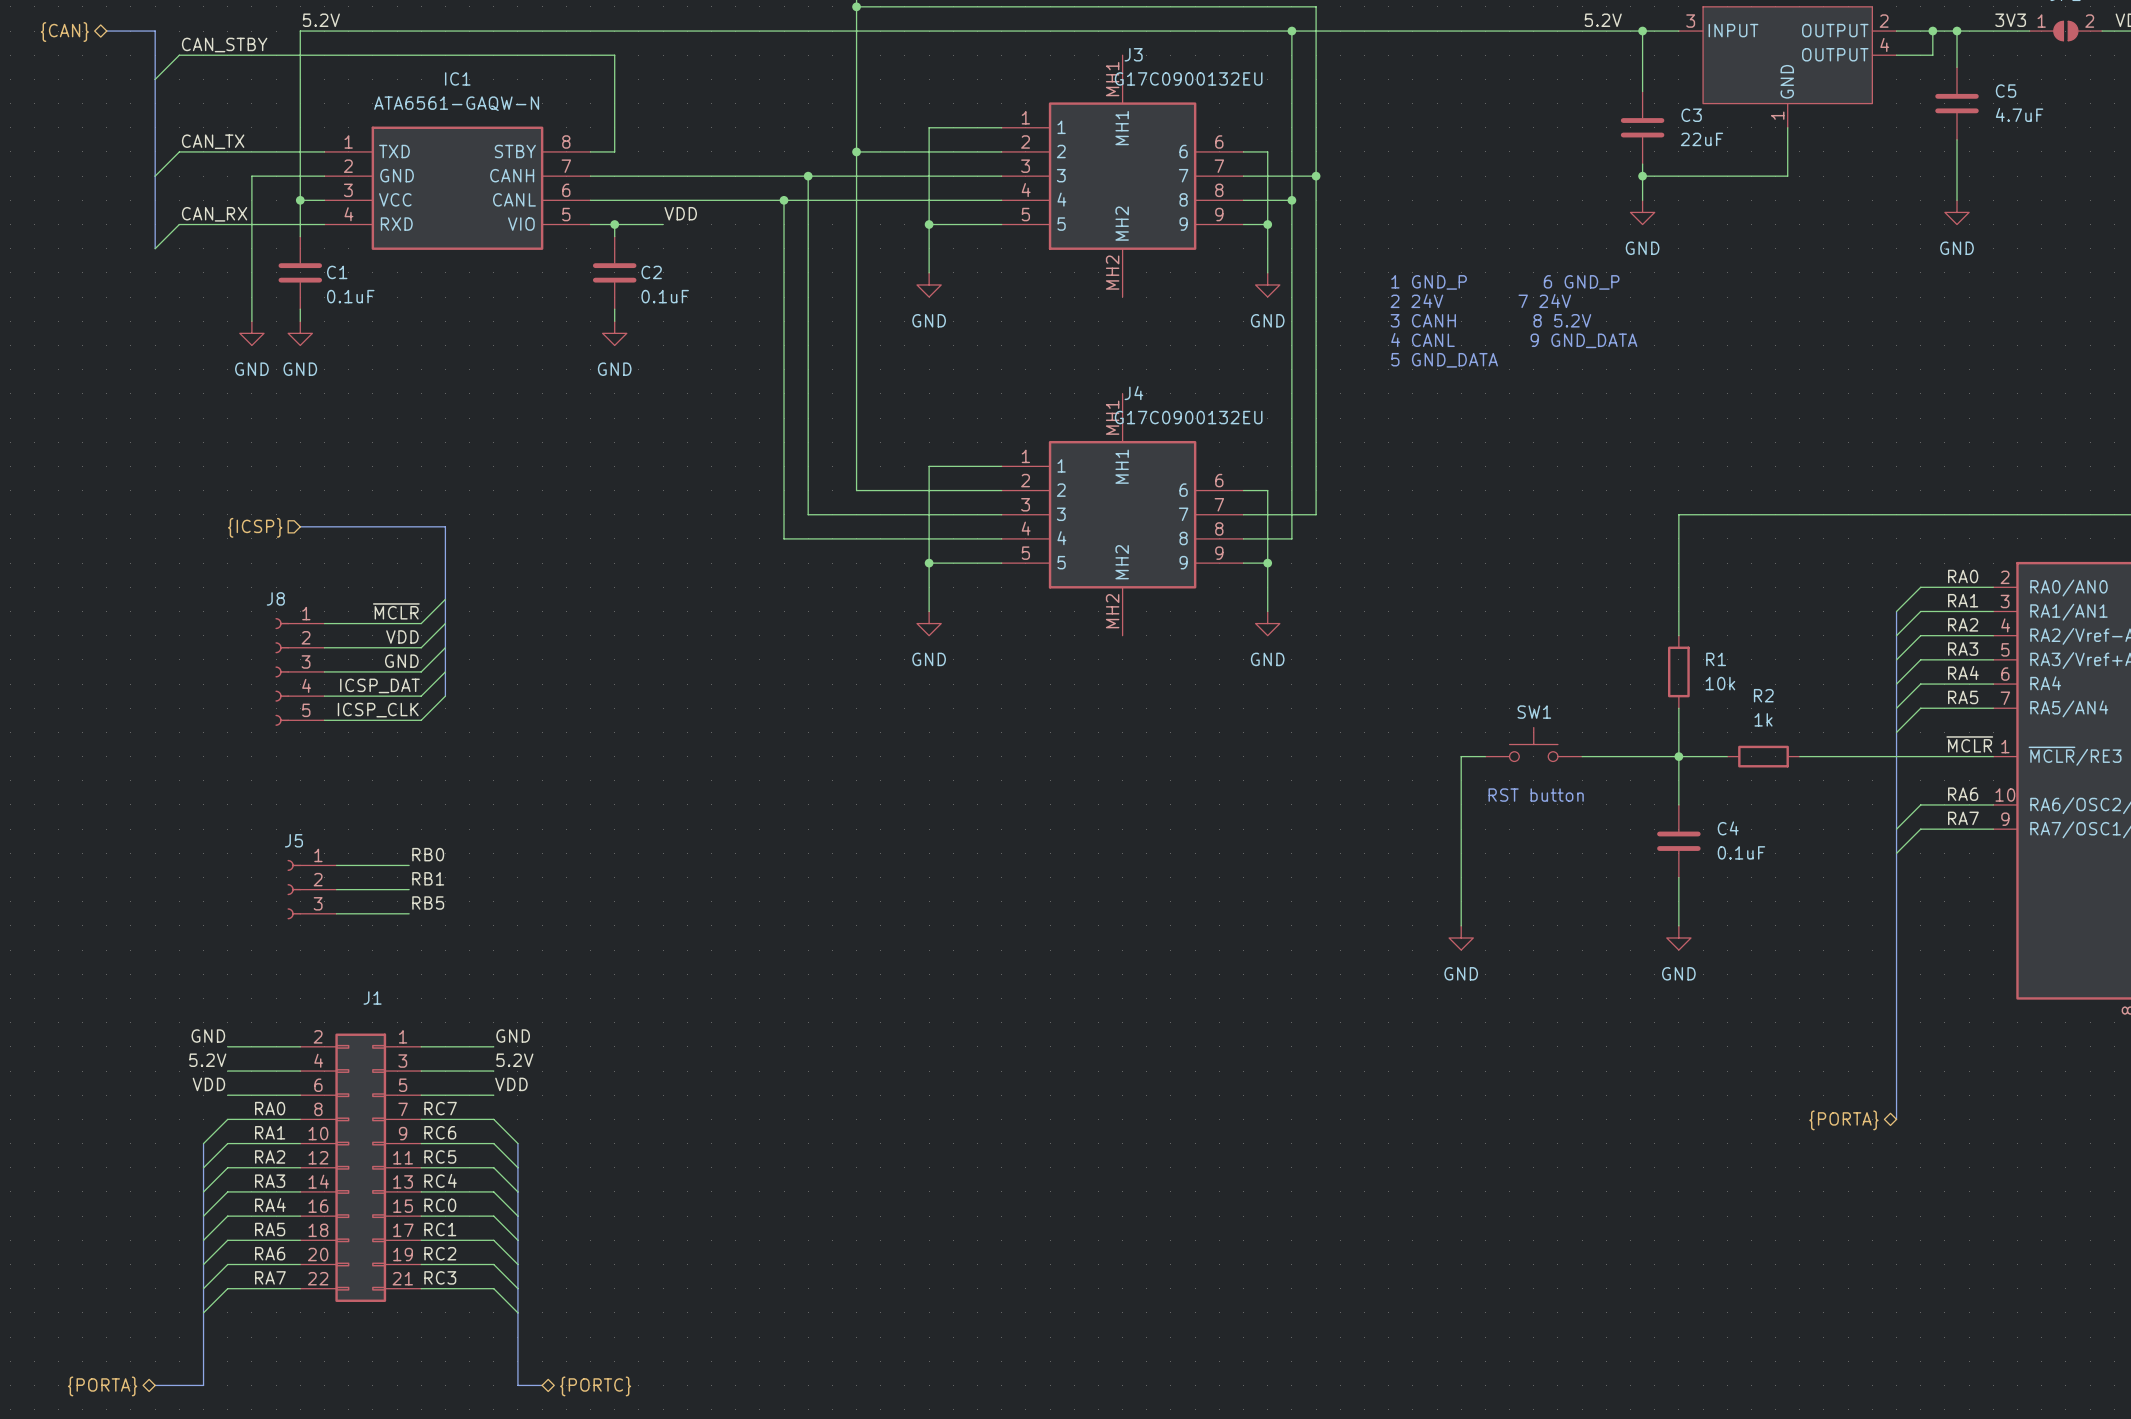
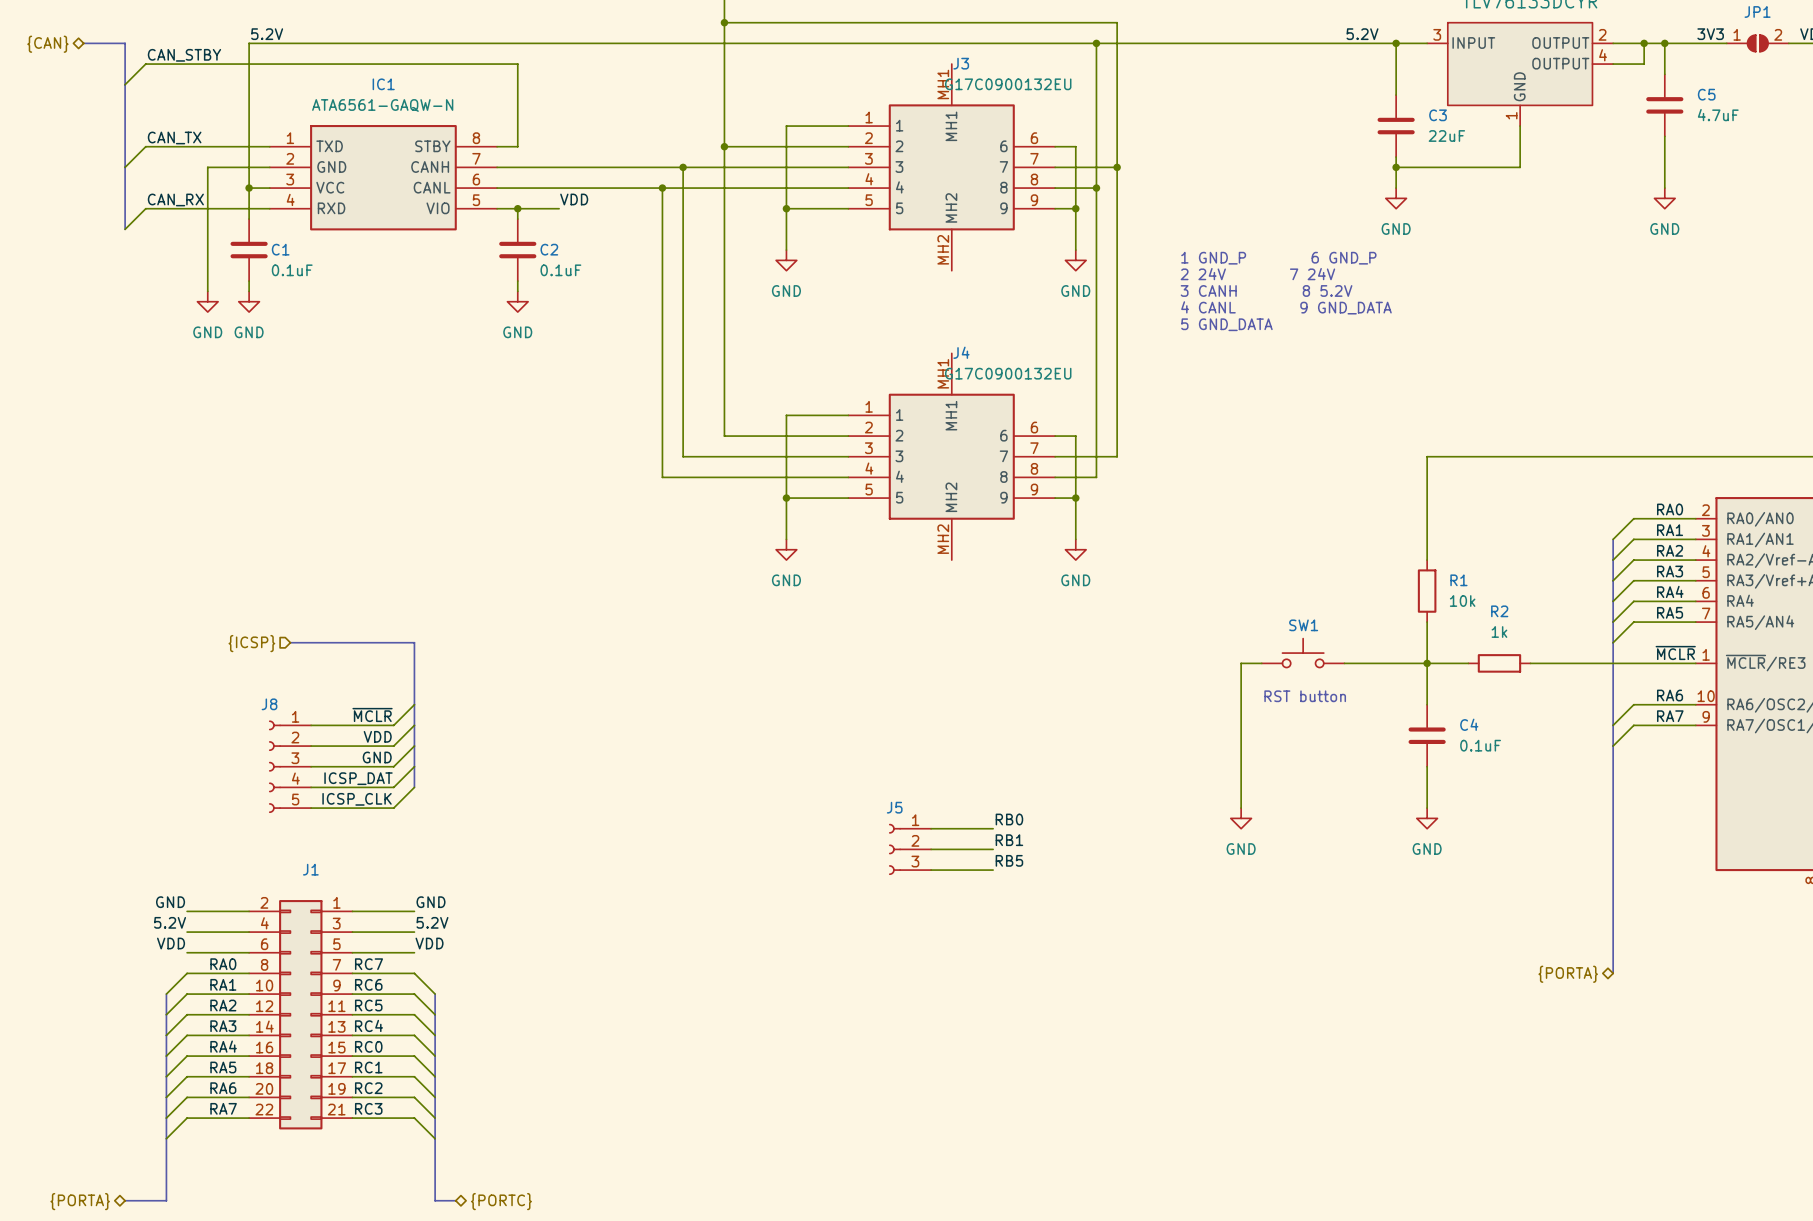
bus: (300, 526) (445, 526) (445, 696) -> (290, 642) (414, 642) (414, 787)
hierarchical label position: {ICSP} (255, 527) -> {ICSP} (251, 643)
wire: (445, 599) (421, 623) (324, 623) -> (414, 704) (393, 725) (311, 725)
label position: ~{MCLR} (396, 611) -> ~{MCLR} (372, 714)
wire: (445, 623) (421, 647) (324, 647) -> (414, 725) (393, 746) (311, 746)
label position: VDD (402, 636) -> VDD (377, 736)
wire: (445, 647) (421, 671) (324, 671) -> (414, 746) (393, 766) (311, 766)
label position: GND (401, 661) -> GND (377, 757)
J8 position: (299, 671) -> (290, 766)
wire: (445, 671) (421, 696) (324, 696) -> (414, 766) (393, 787) (311, 787)
label position: ICSP_DAT (379, 685) -> ICSP_DAT (358, 778)
wire: (445, 696) (421, 720) (324, 720) -> (414, 787) (393, 808) (311, 808)
label position: ICSP_CLK (378, 710) -> ICSP_CLK (357, 799)
label: RB0 (428, 854) -> none
wire: (336, 865) (409, 865) -> none
label: RB1 (428, 878) -> none
J5 position: (312, 889) -> (910, 849)
wire: (336, 889) (409, 889) -> none
label: RB5 (428, 903) -> none
wire: (336, 913) (409, 913) -> none
label: none -> RB0 (1009, 819)
wire: none -> (931, 828) (993, 828)
label: none -> RB1 (1009, 840)
wire: none -> (931, 849) (993, 849)
label: none -> RB5 (1009, 860)
wire: none -> (931, 870) (993, 870)

